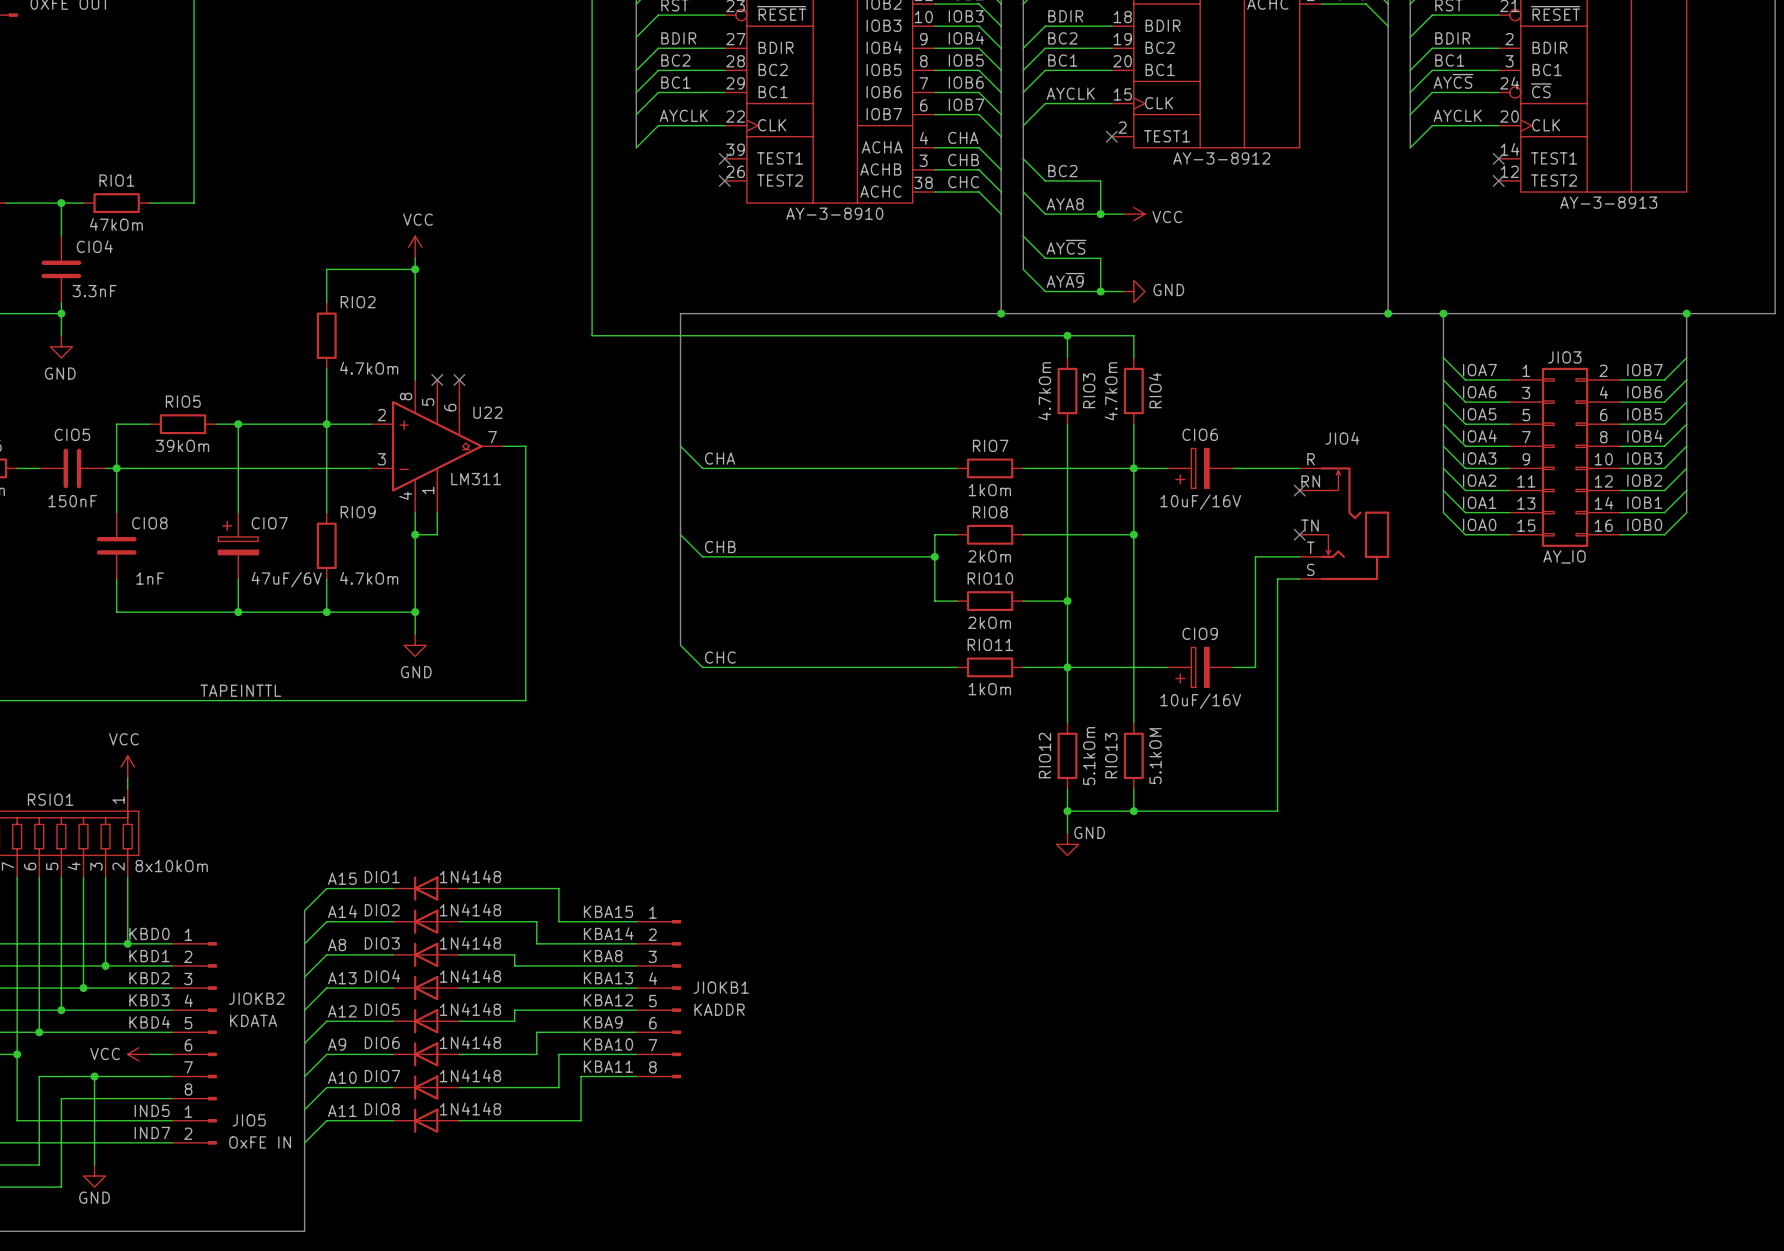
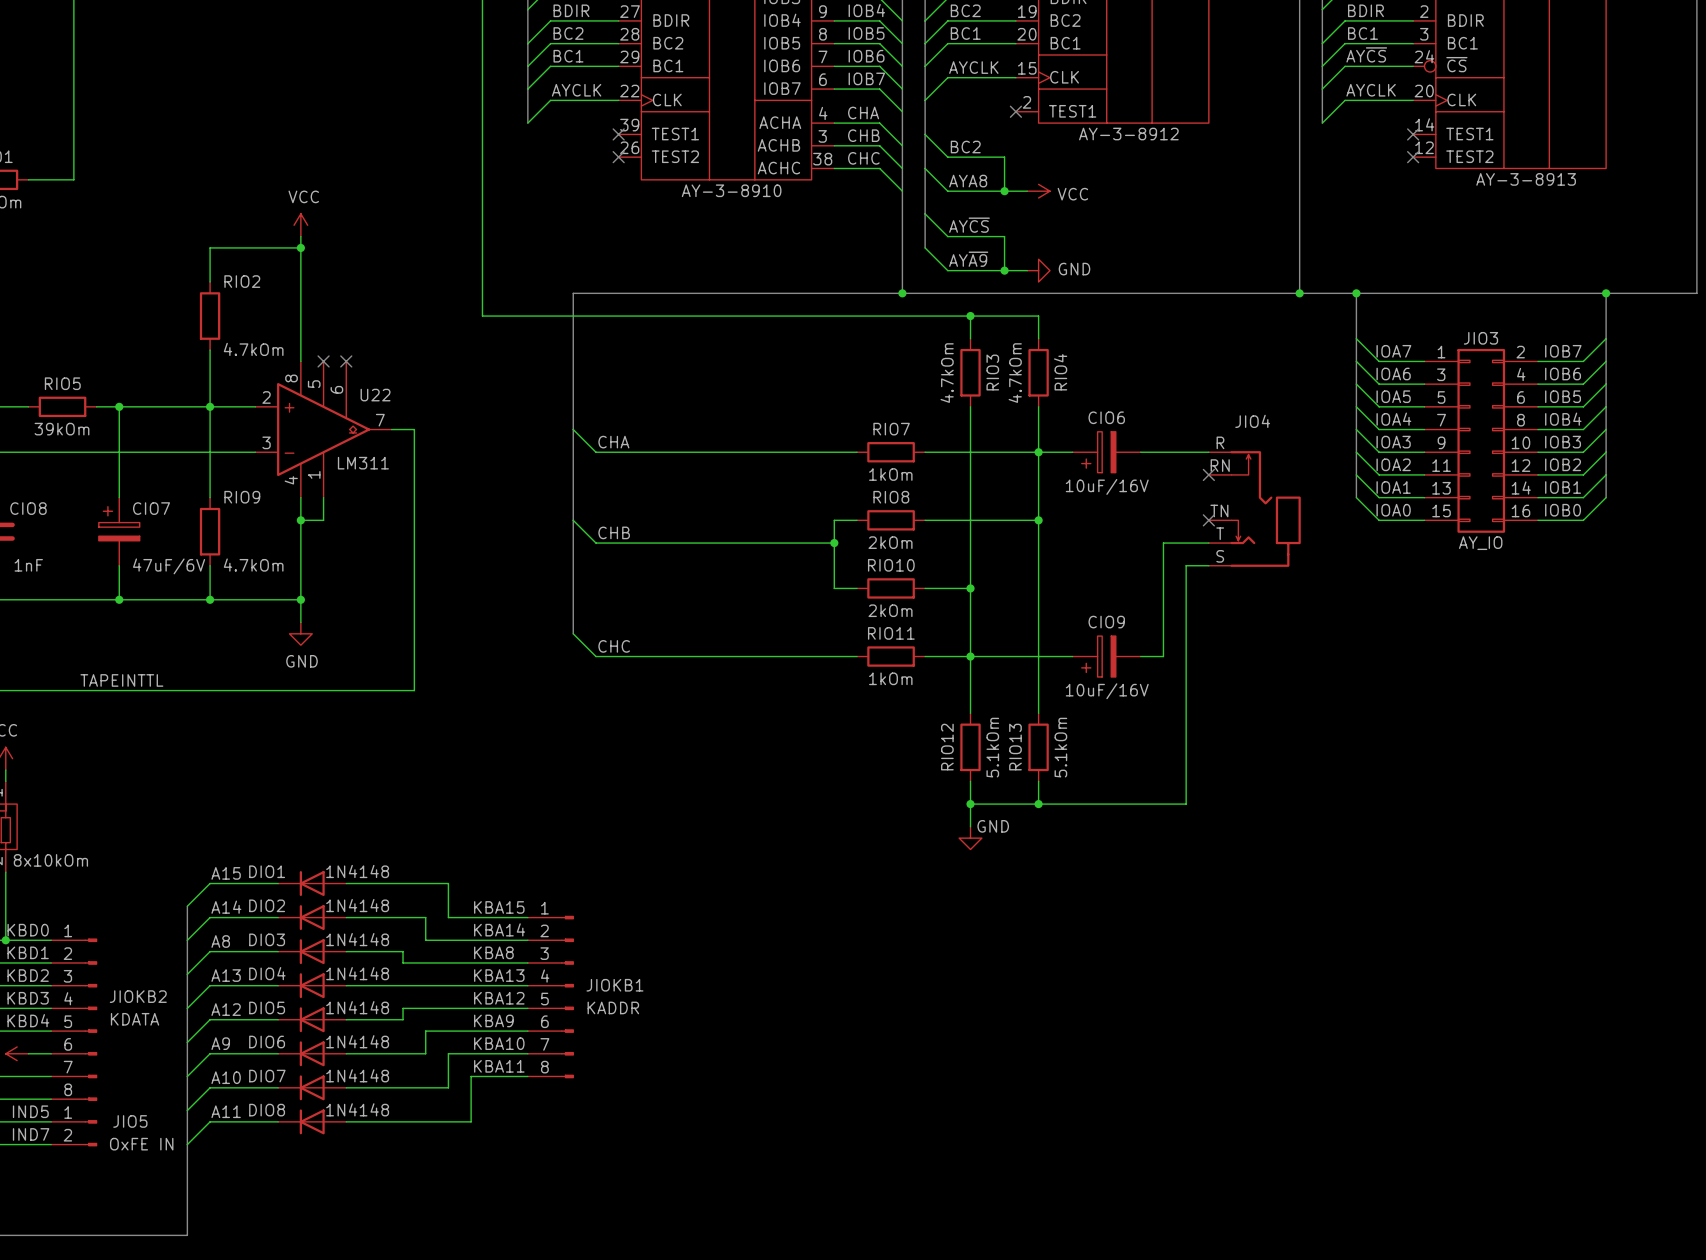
RIO13 value: 5.1kOM (1155, 756) -> 5.1kOm (1060, 747)

